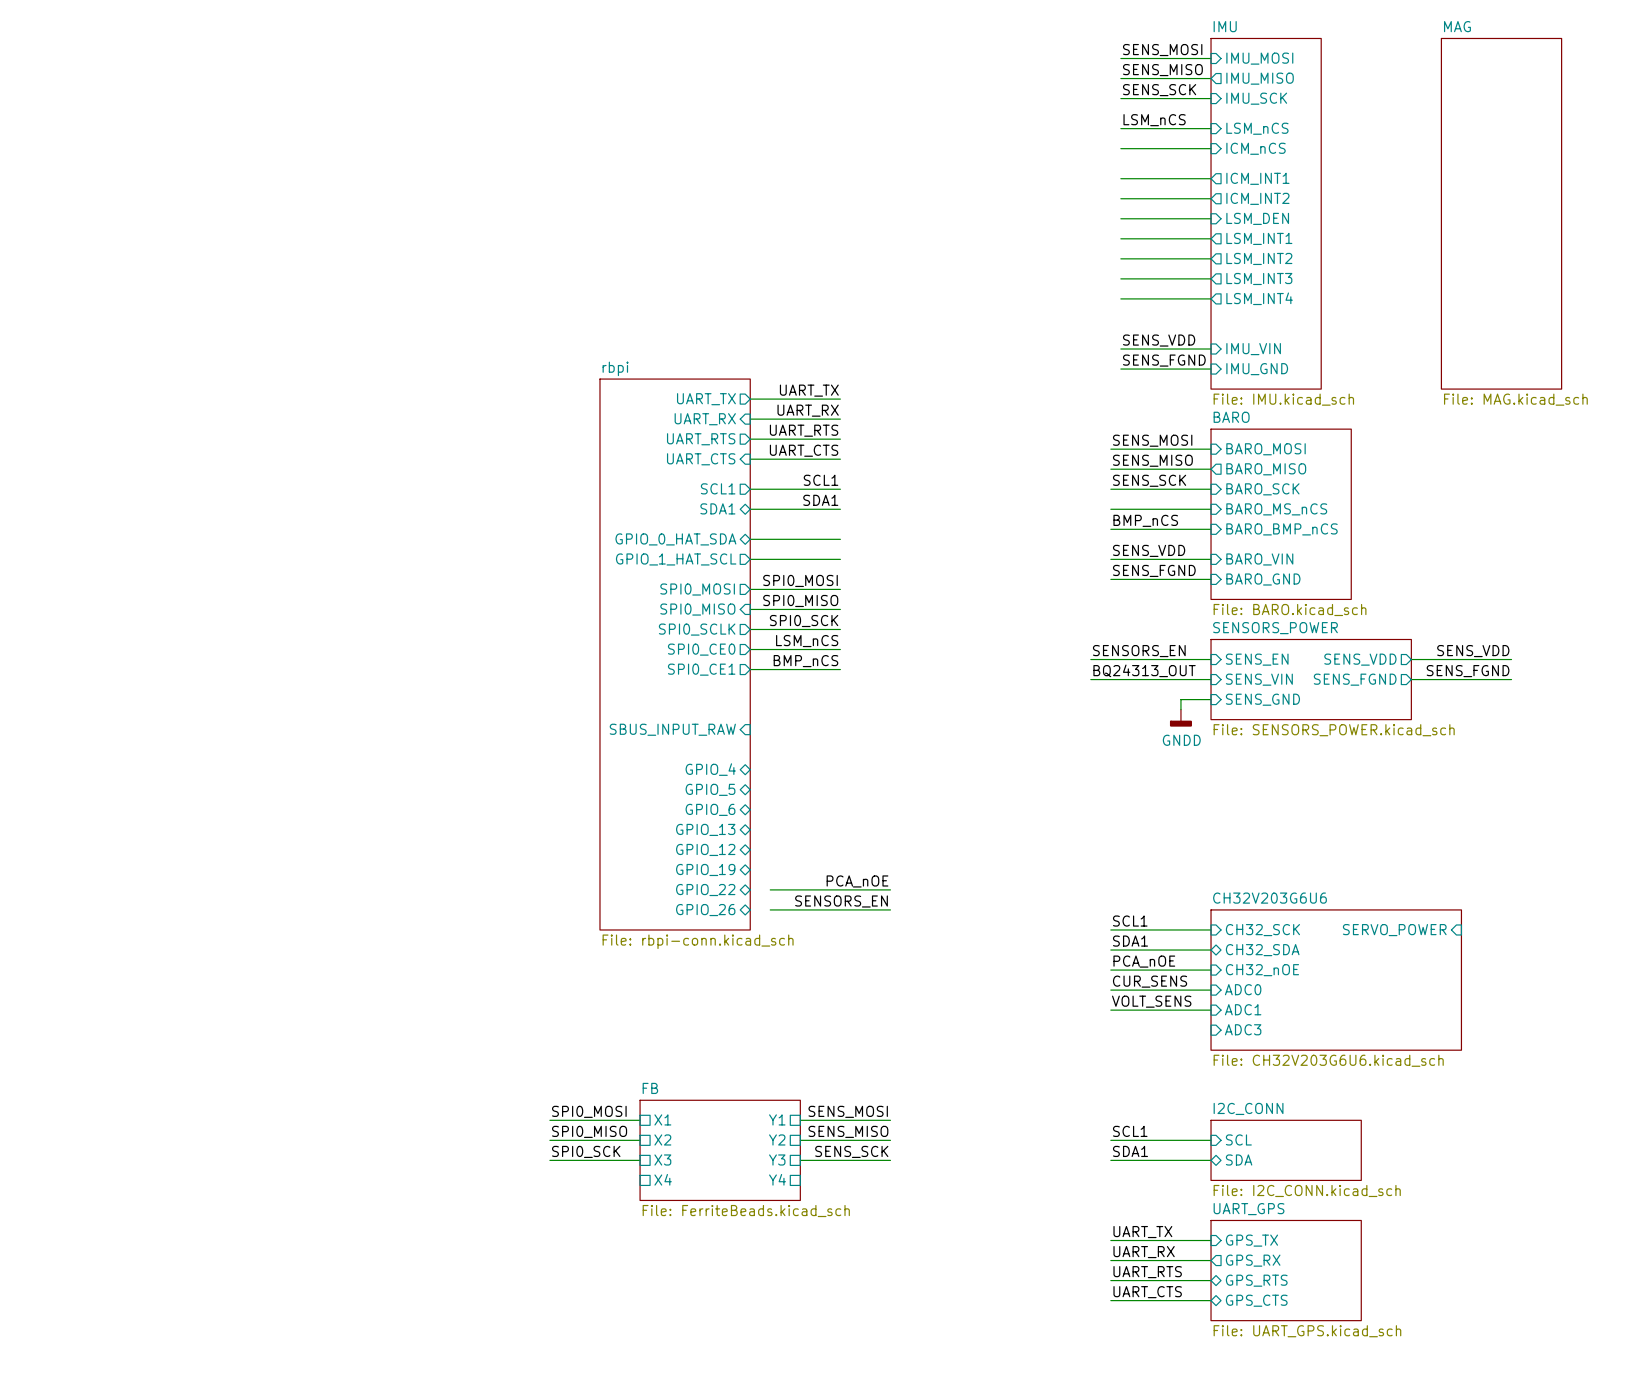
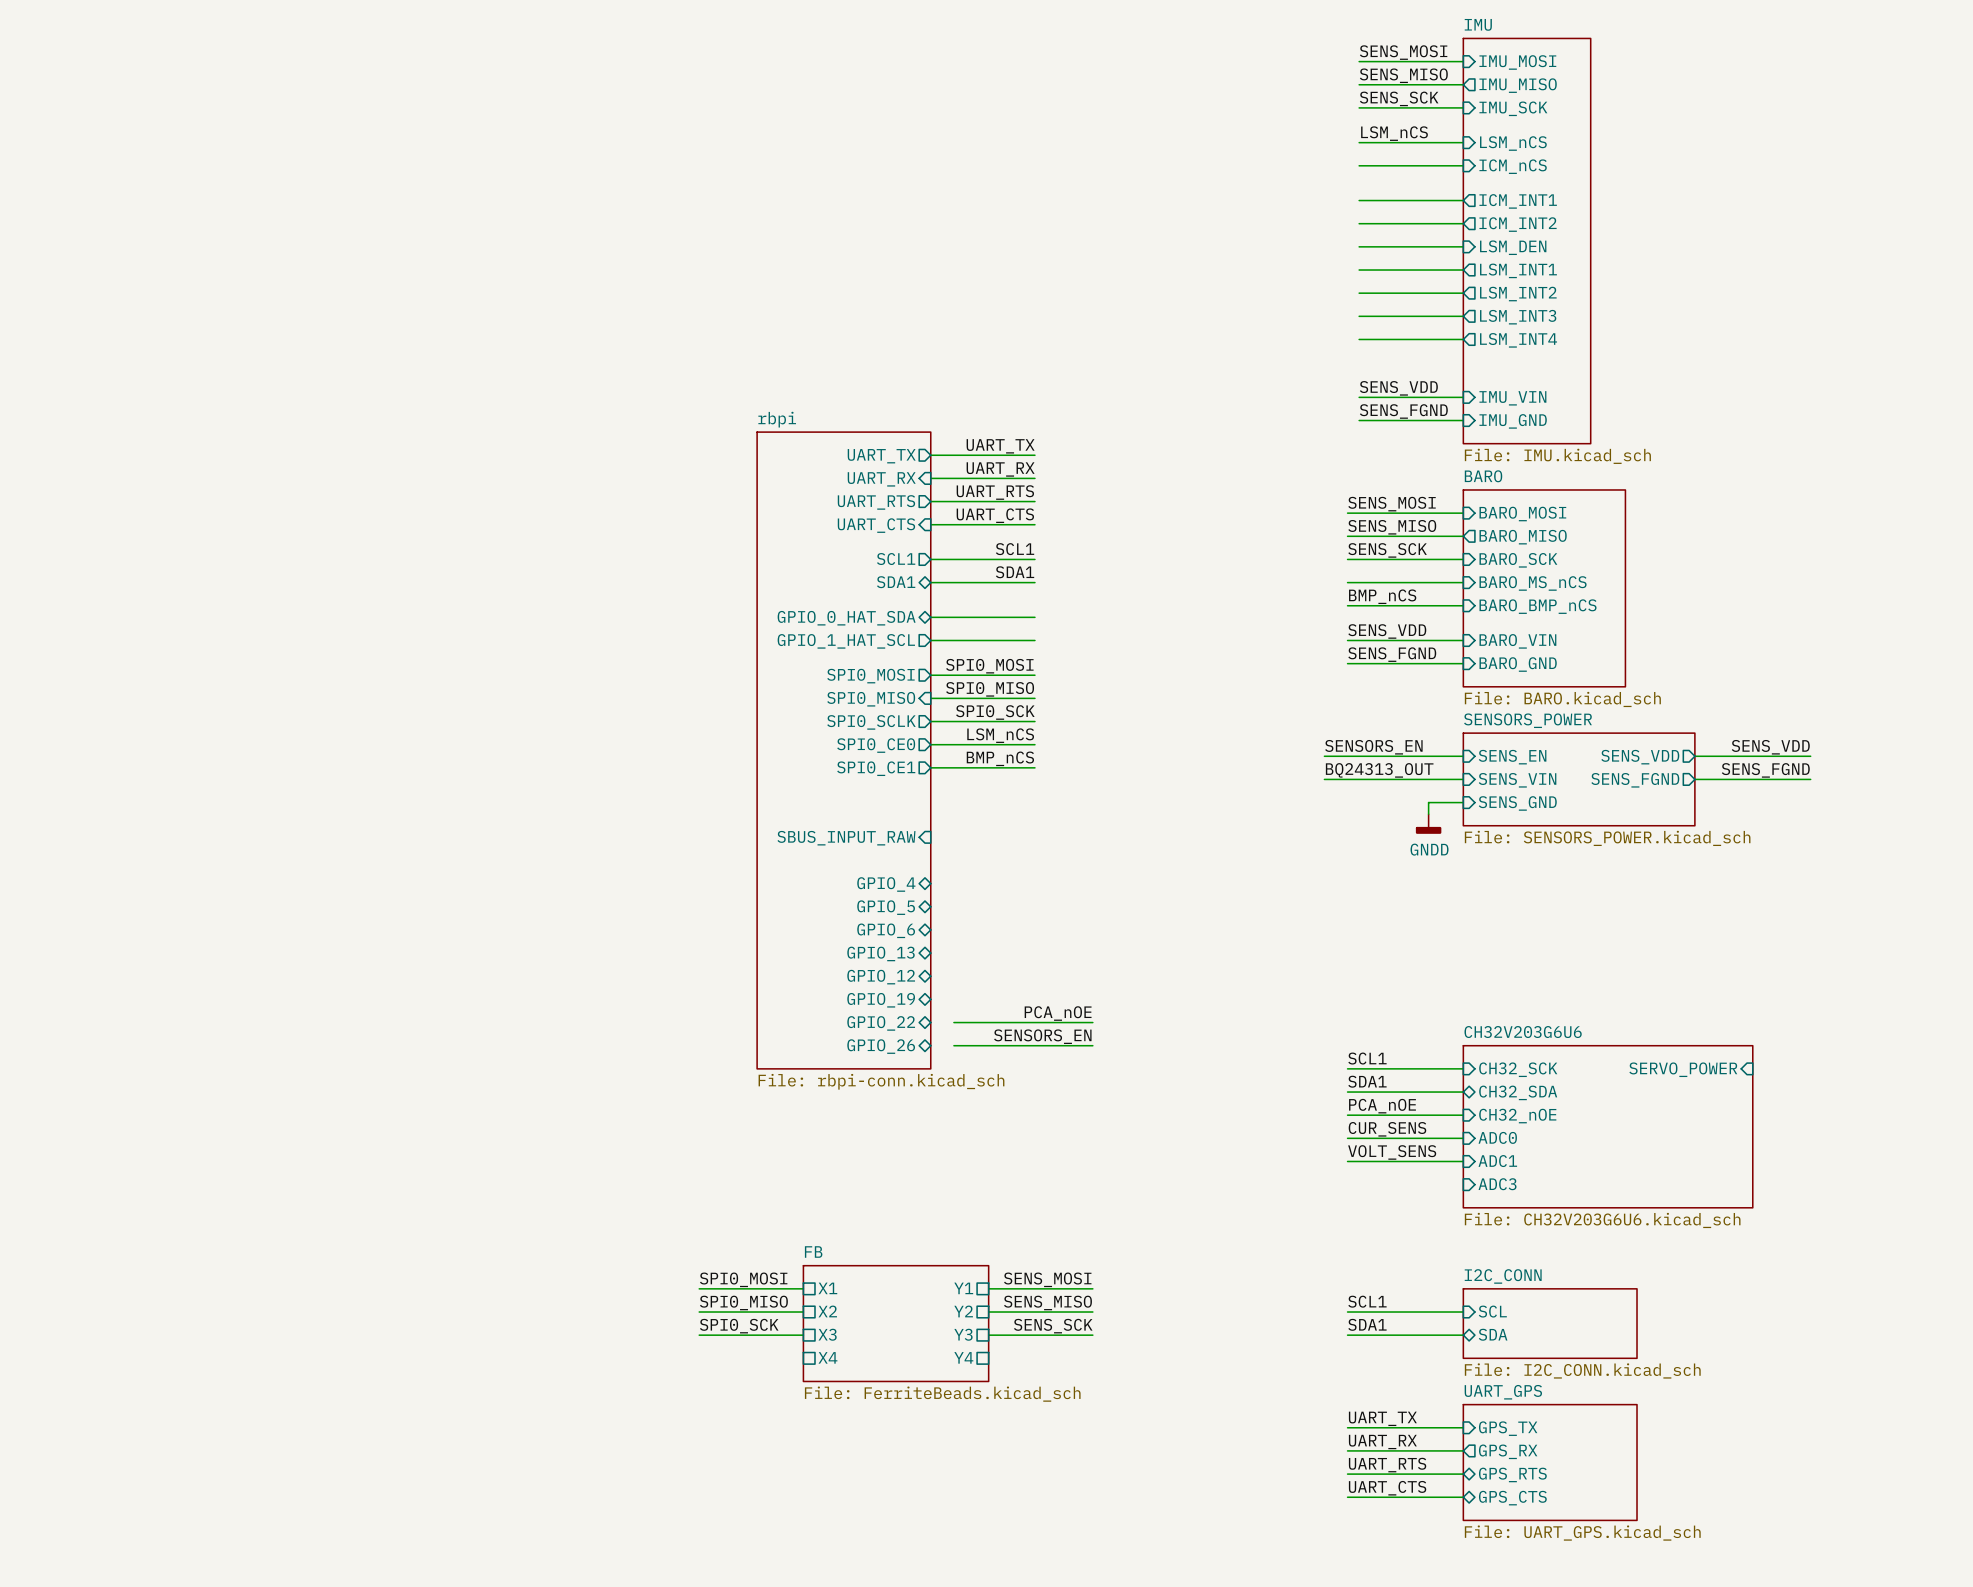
sheet MAG: File: MAG.kicad_sch (1501, 213) -> none

